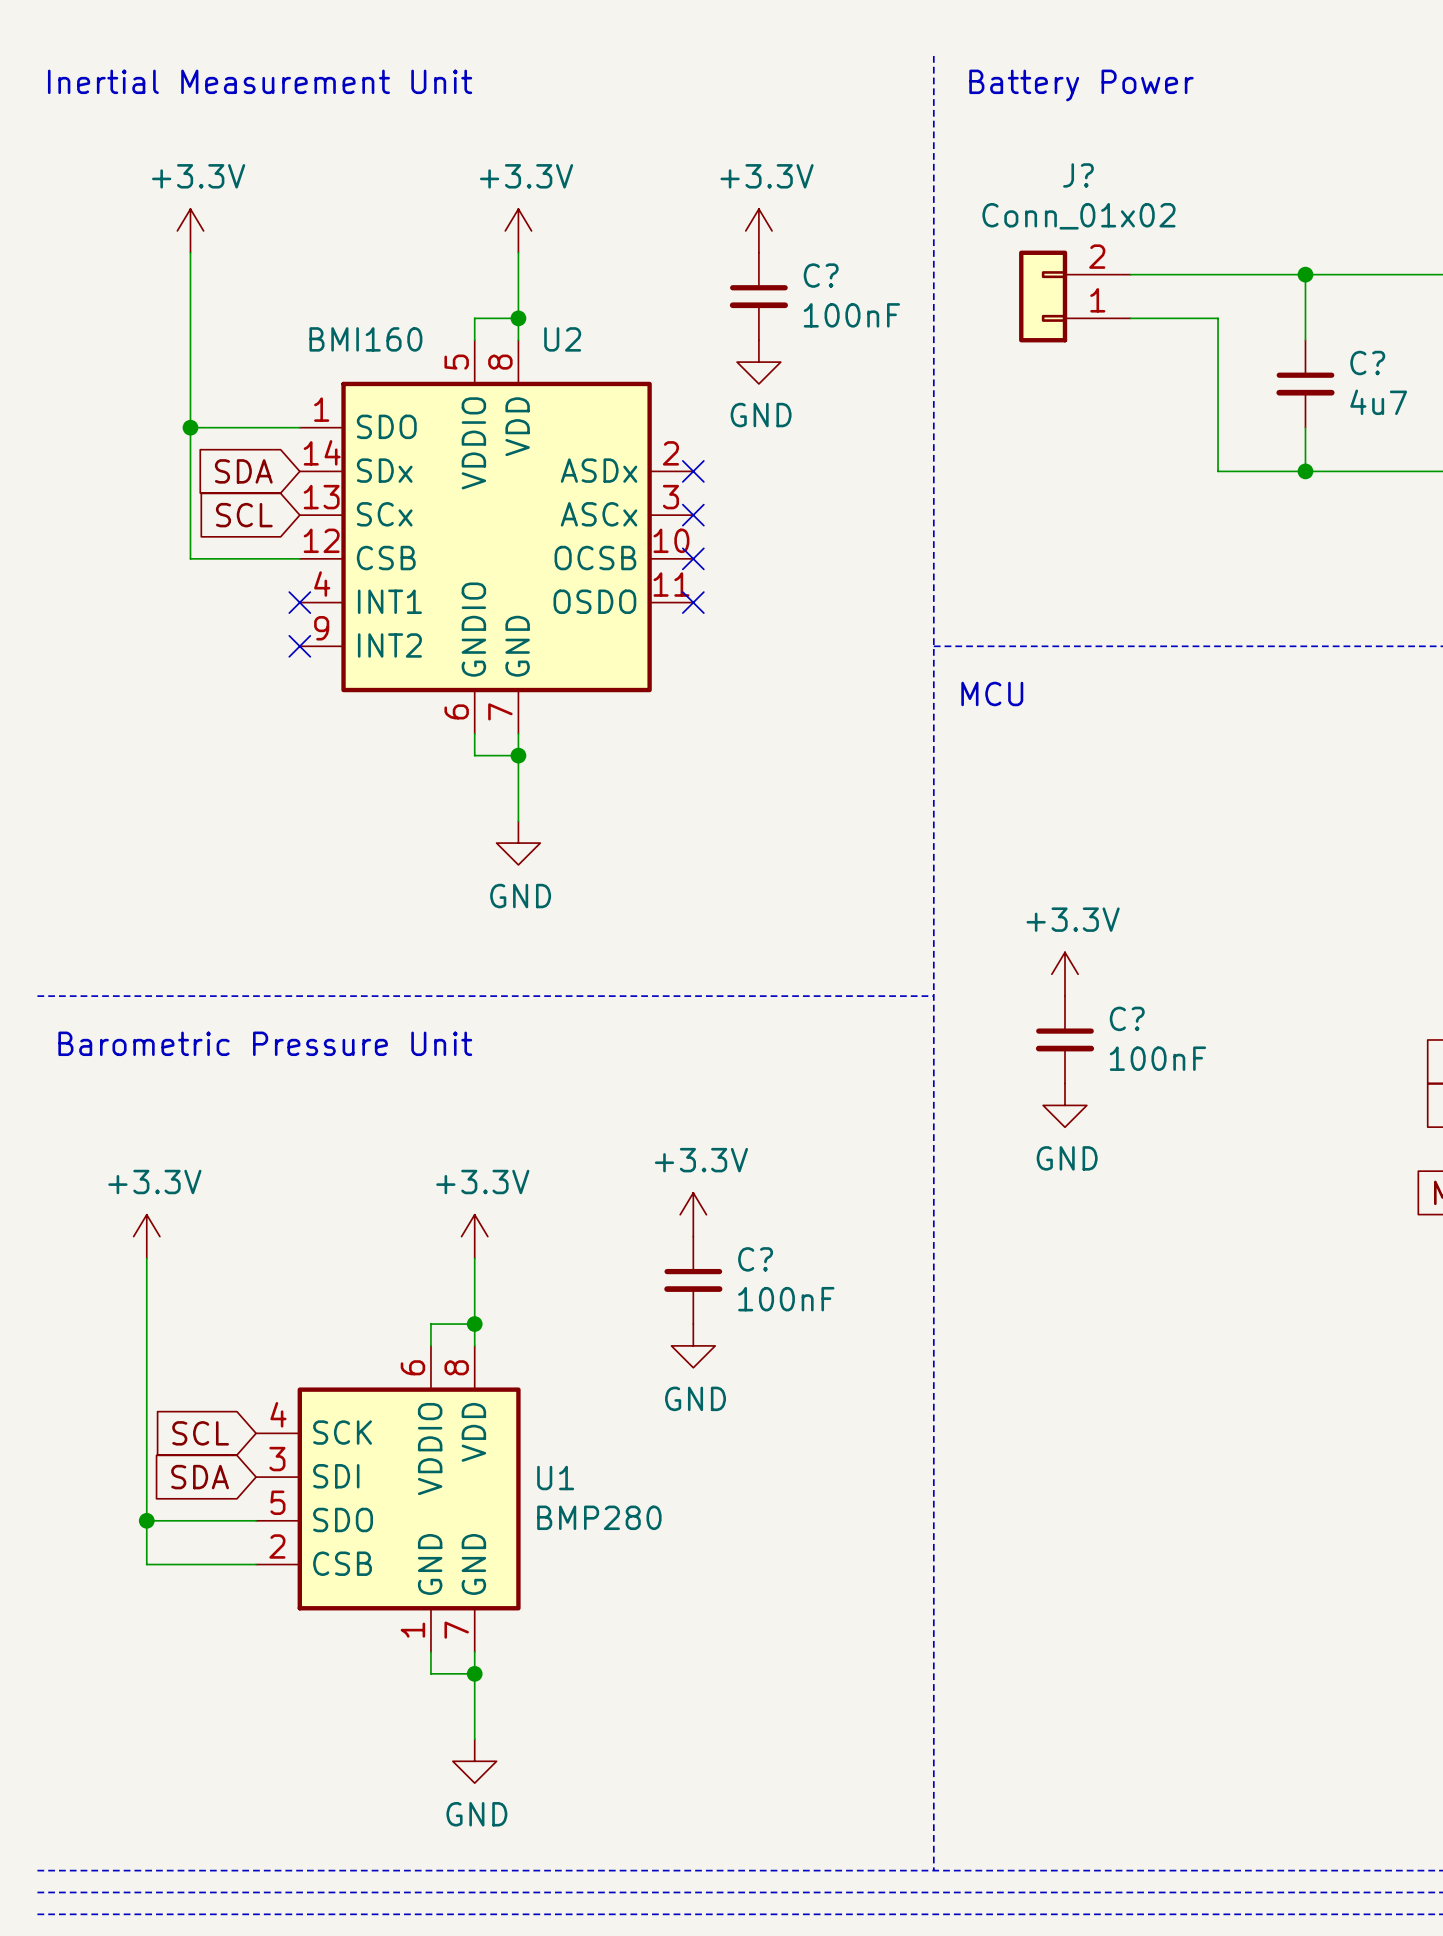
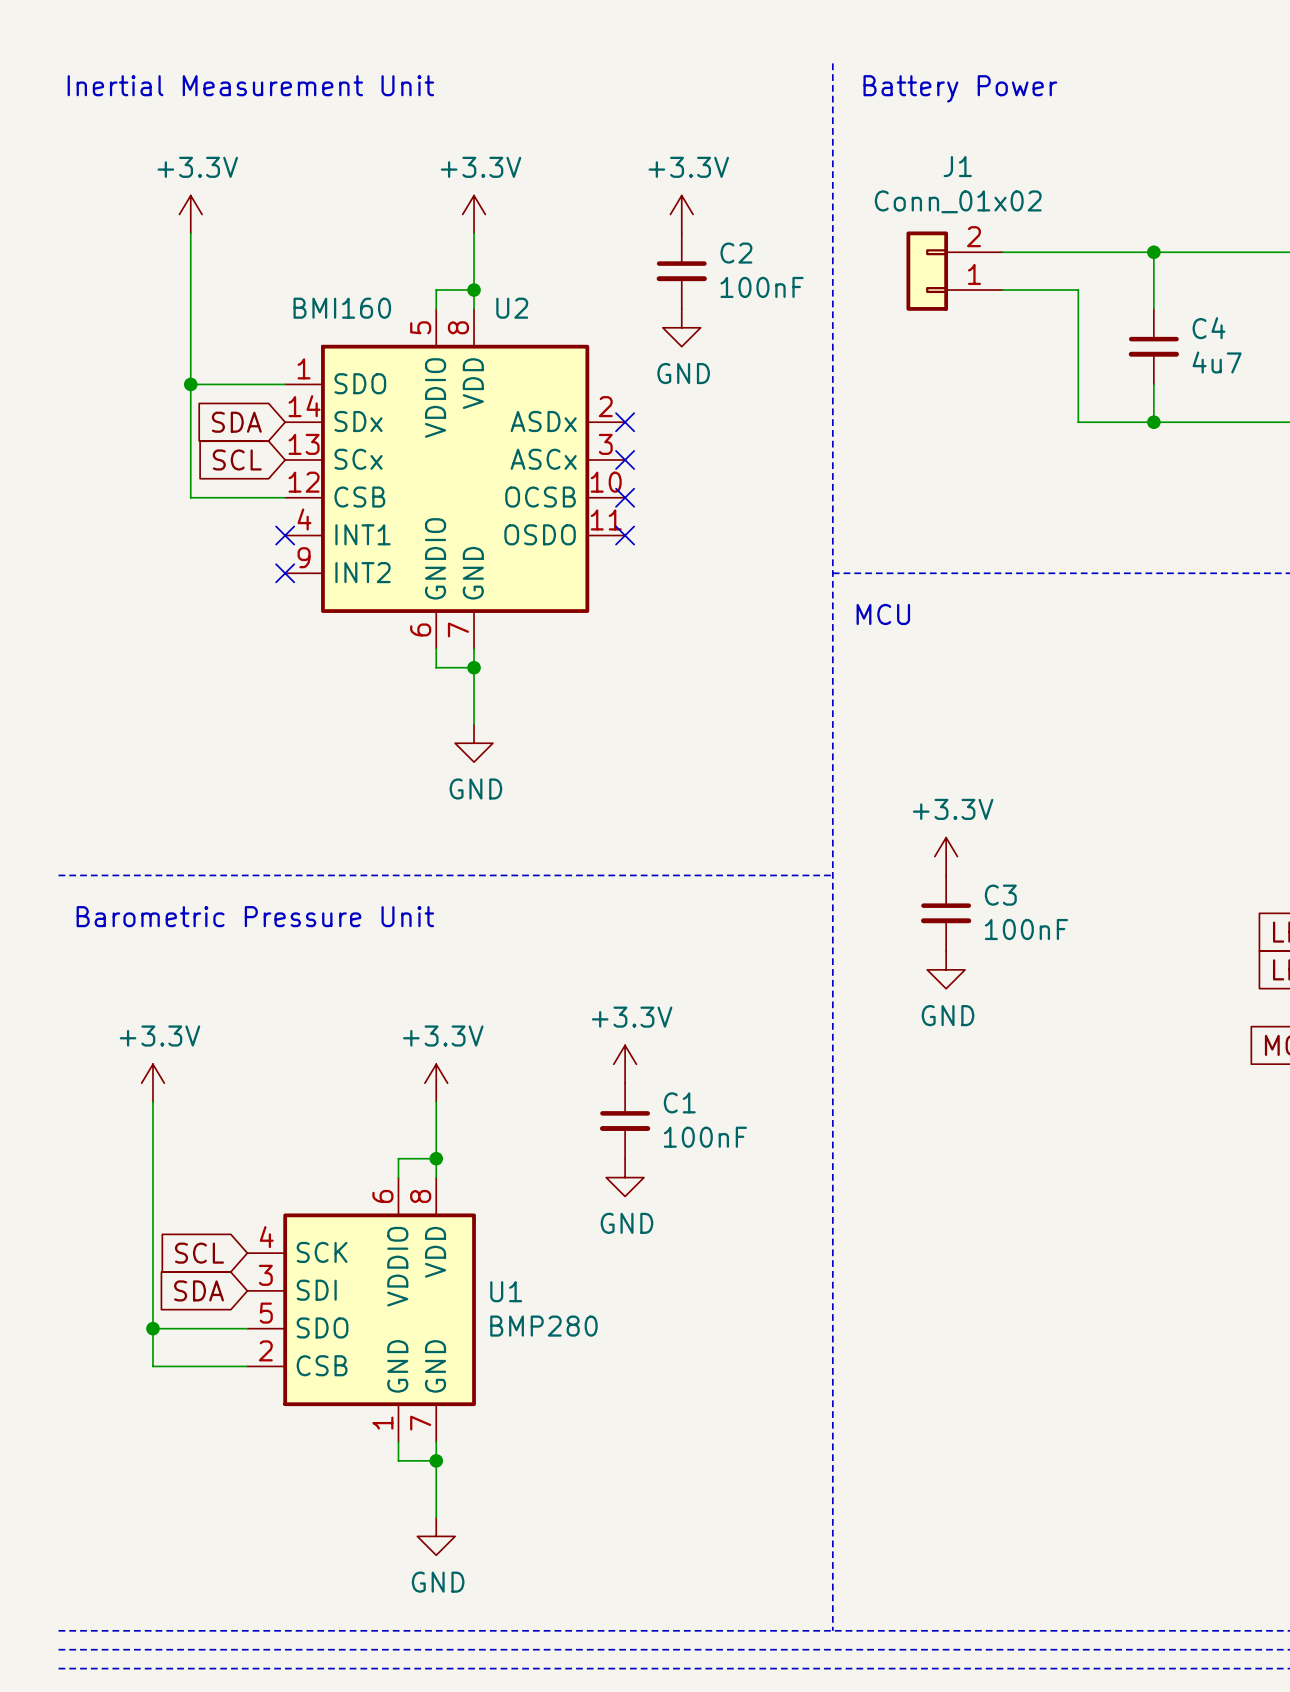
J? name: J? (1078, 175) -> J1 (957, 166)
C? name: C? (821, 275) -> C2 (736, 253)
C? name: C? (1367, 363) -> C4 (1208, 328)
C? name: C? (1127, 1018) -> C3 (1000, 895)
C? name: C? (755, 1259) -> C1 (679, 1102)

